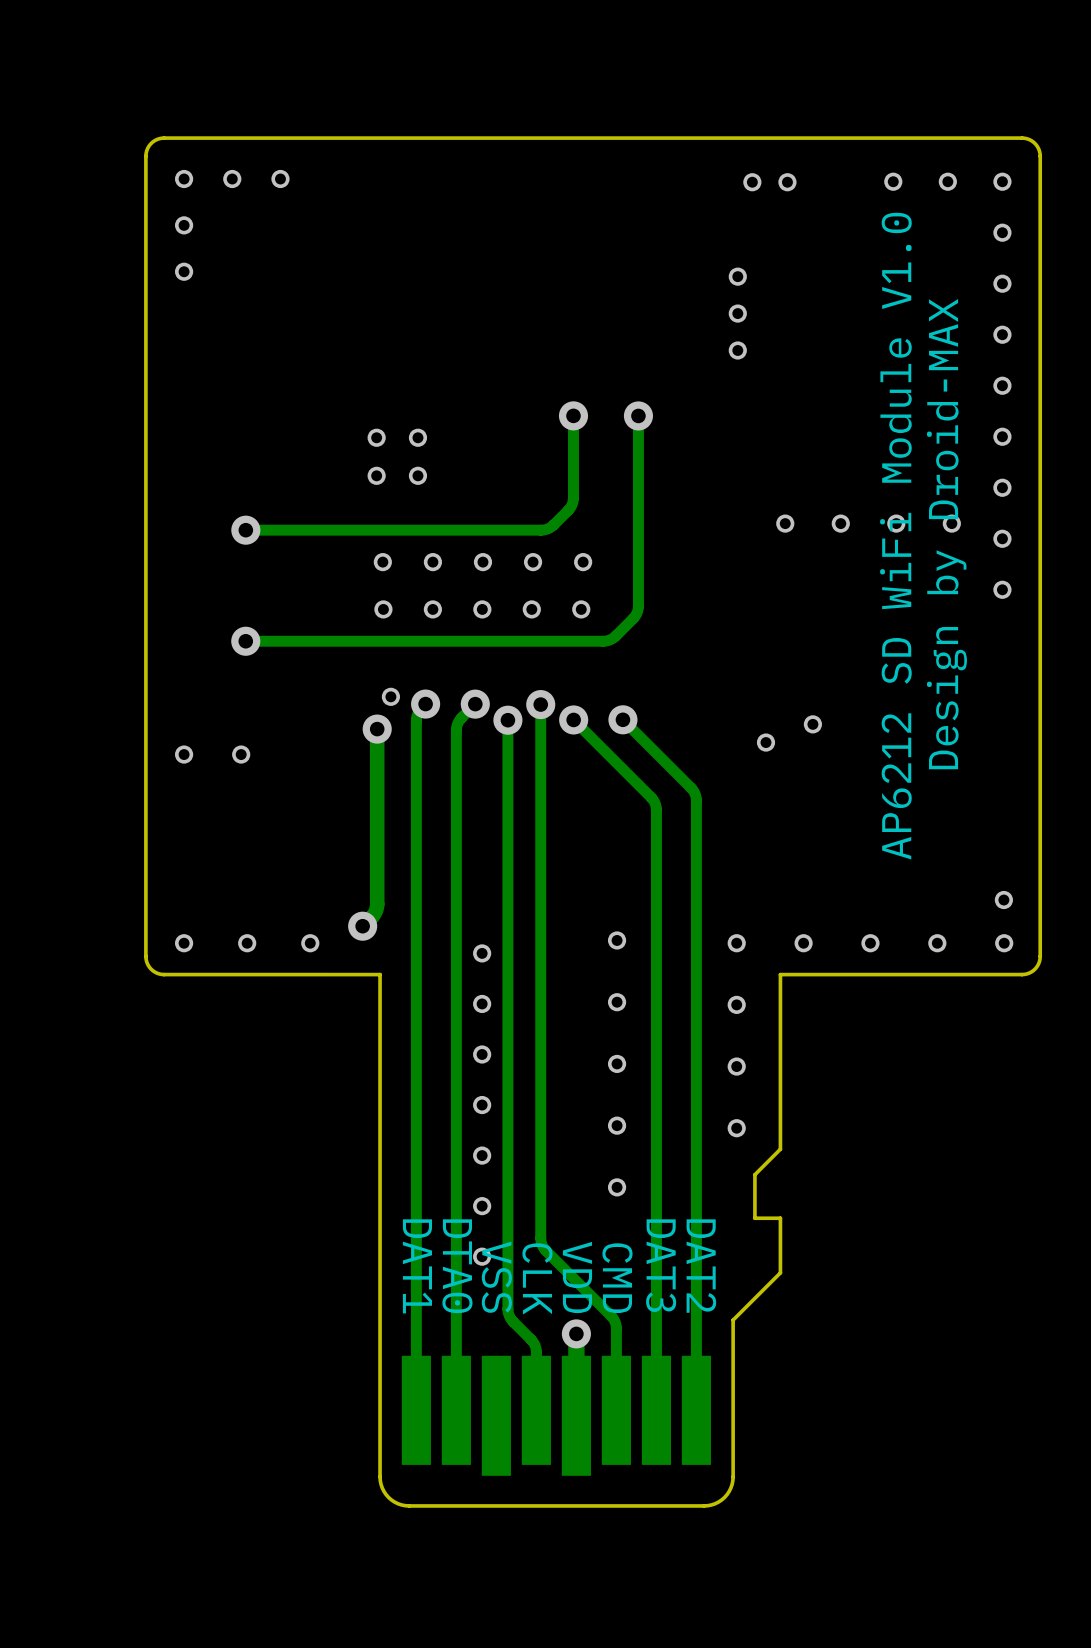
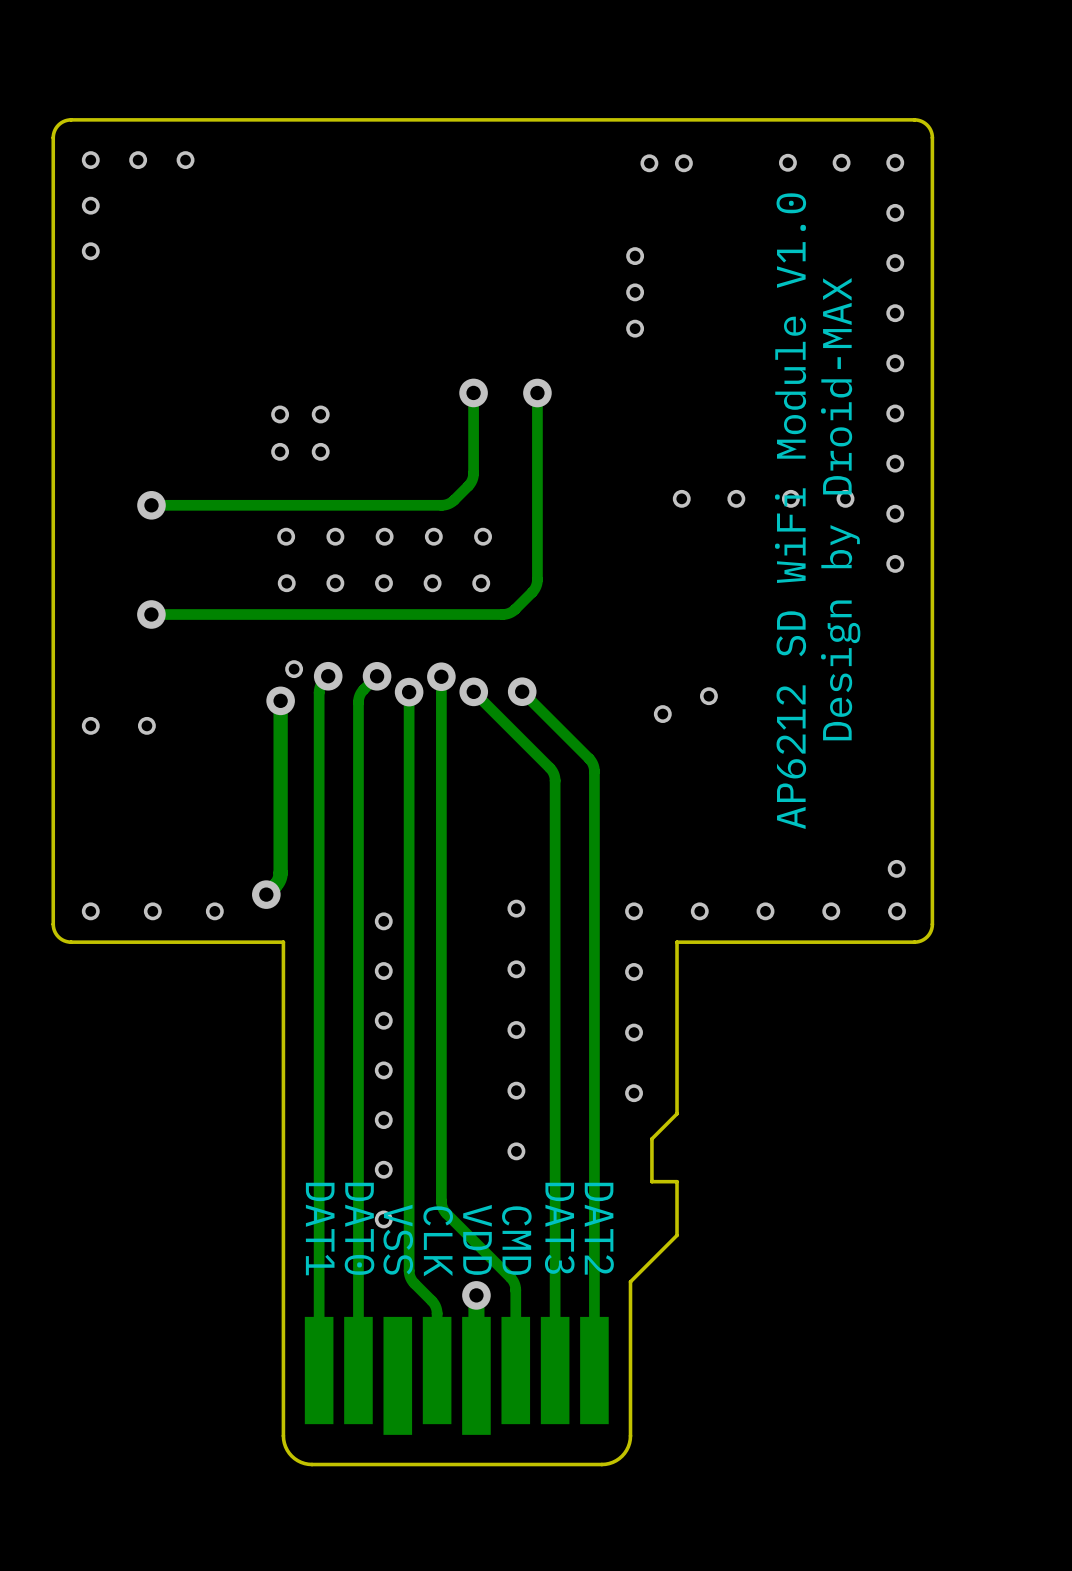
part text: DTA0 (457, 1266) -> DAT0 (359, 1228)

